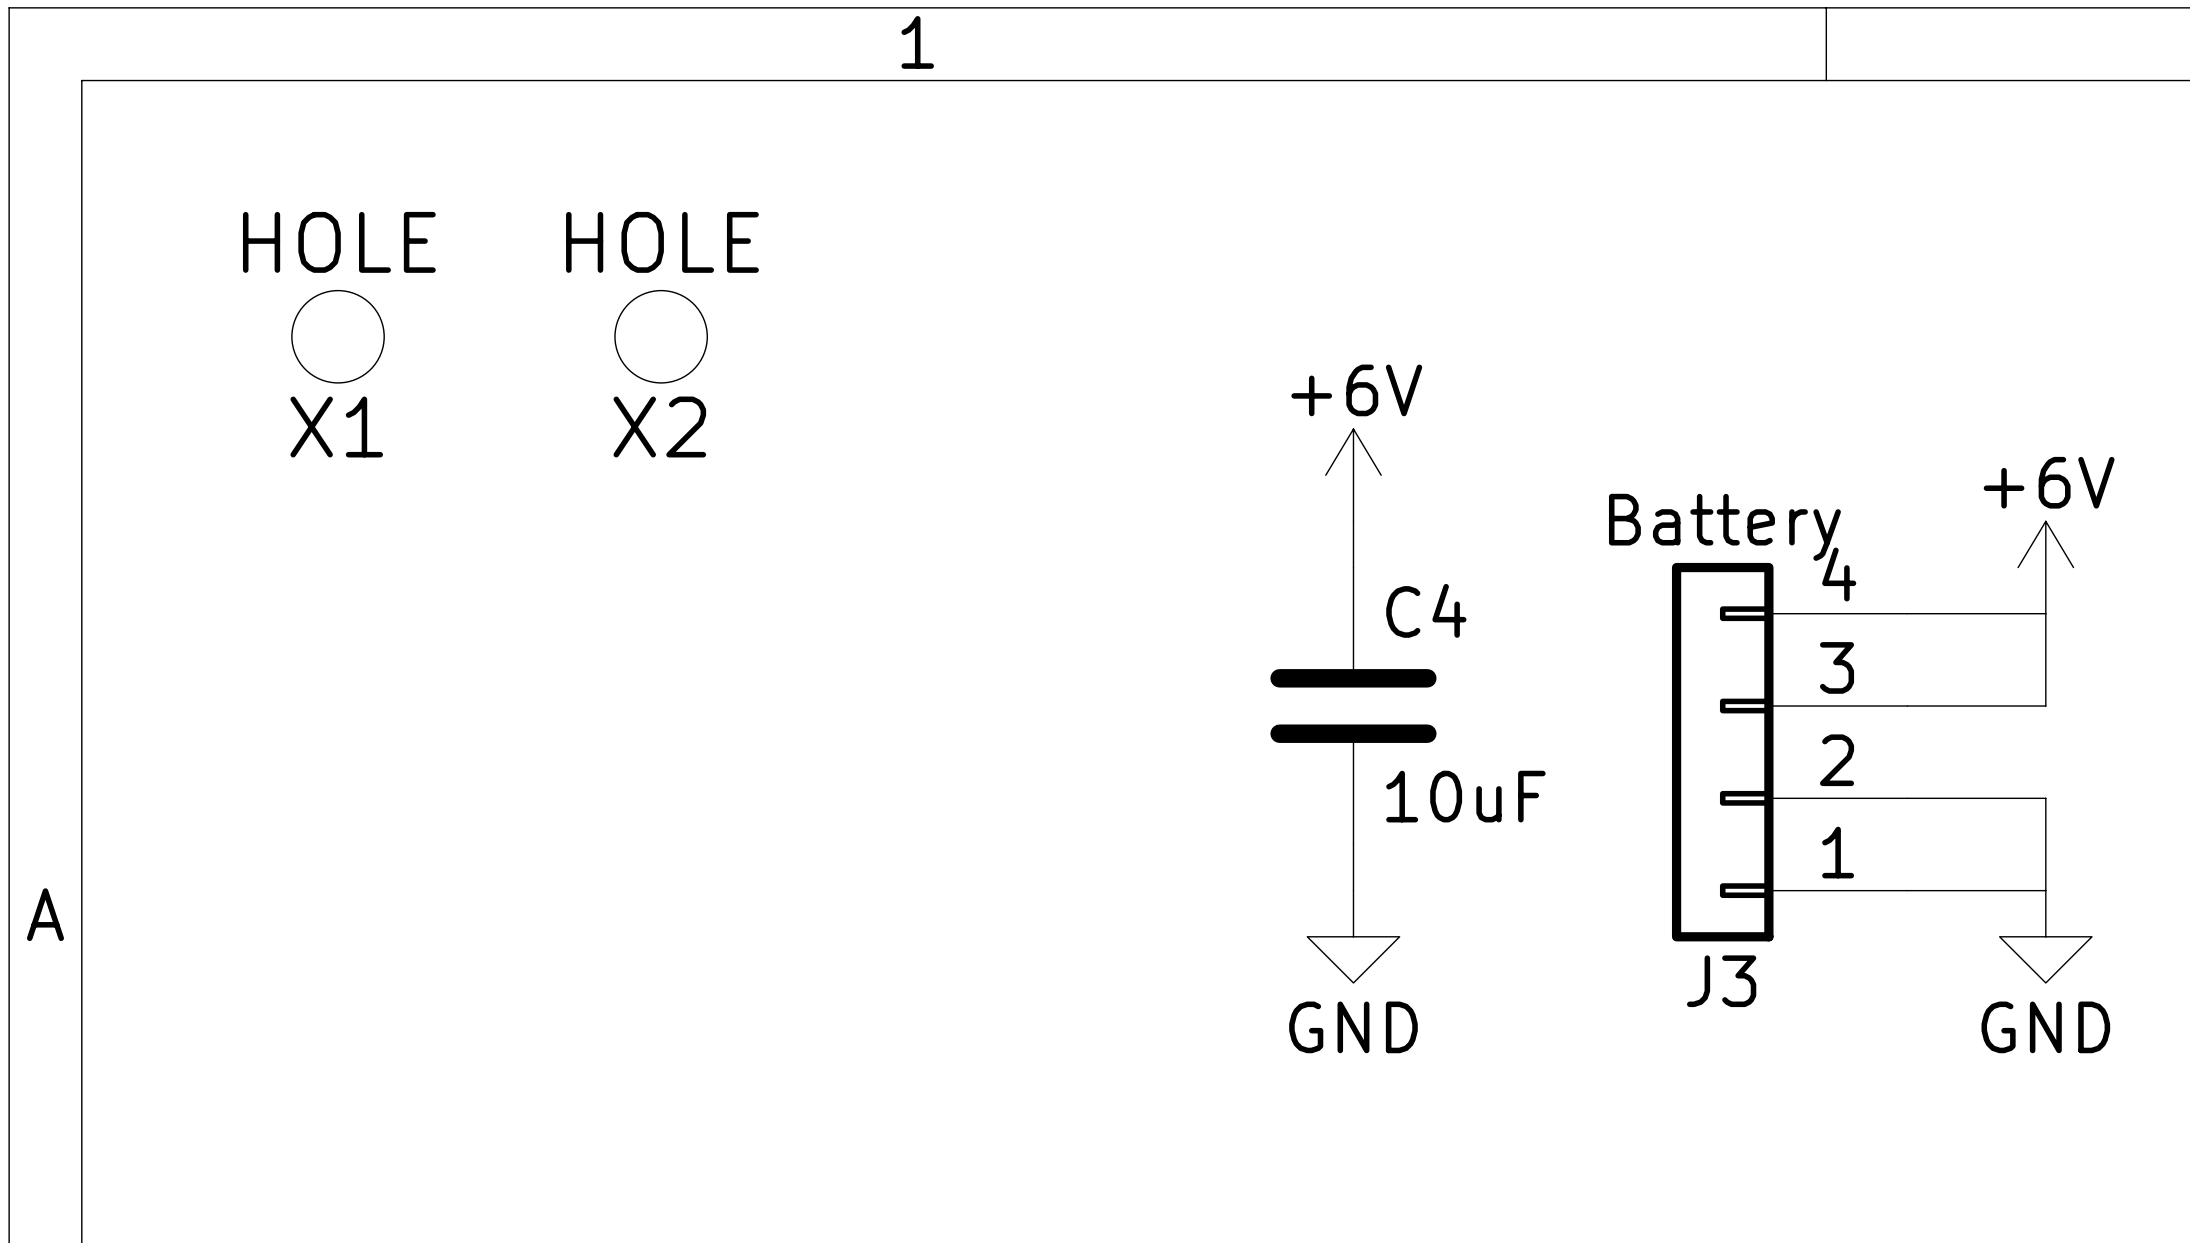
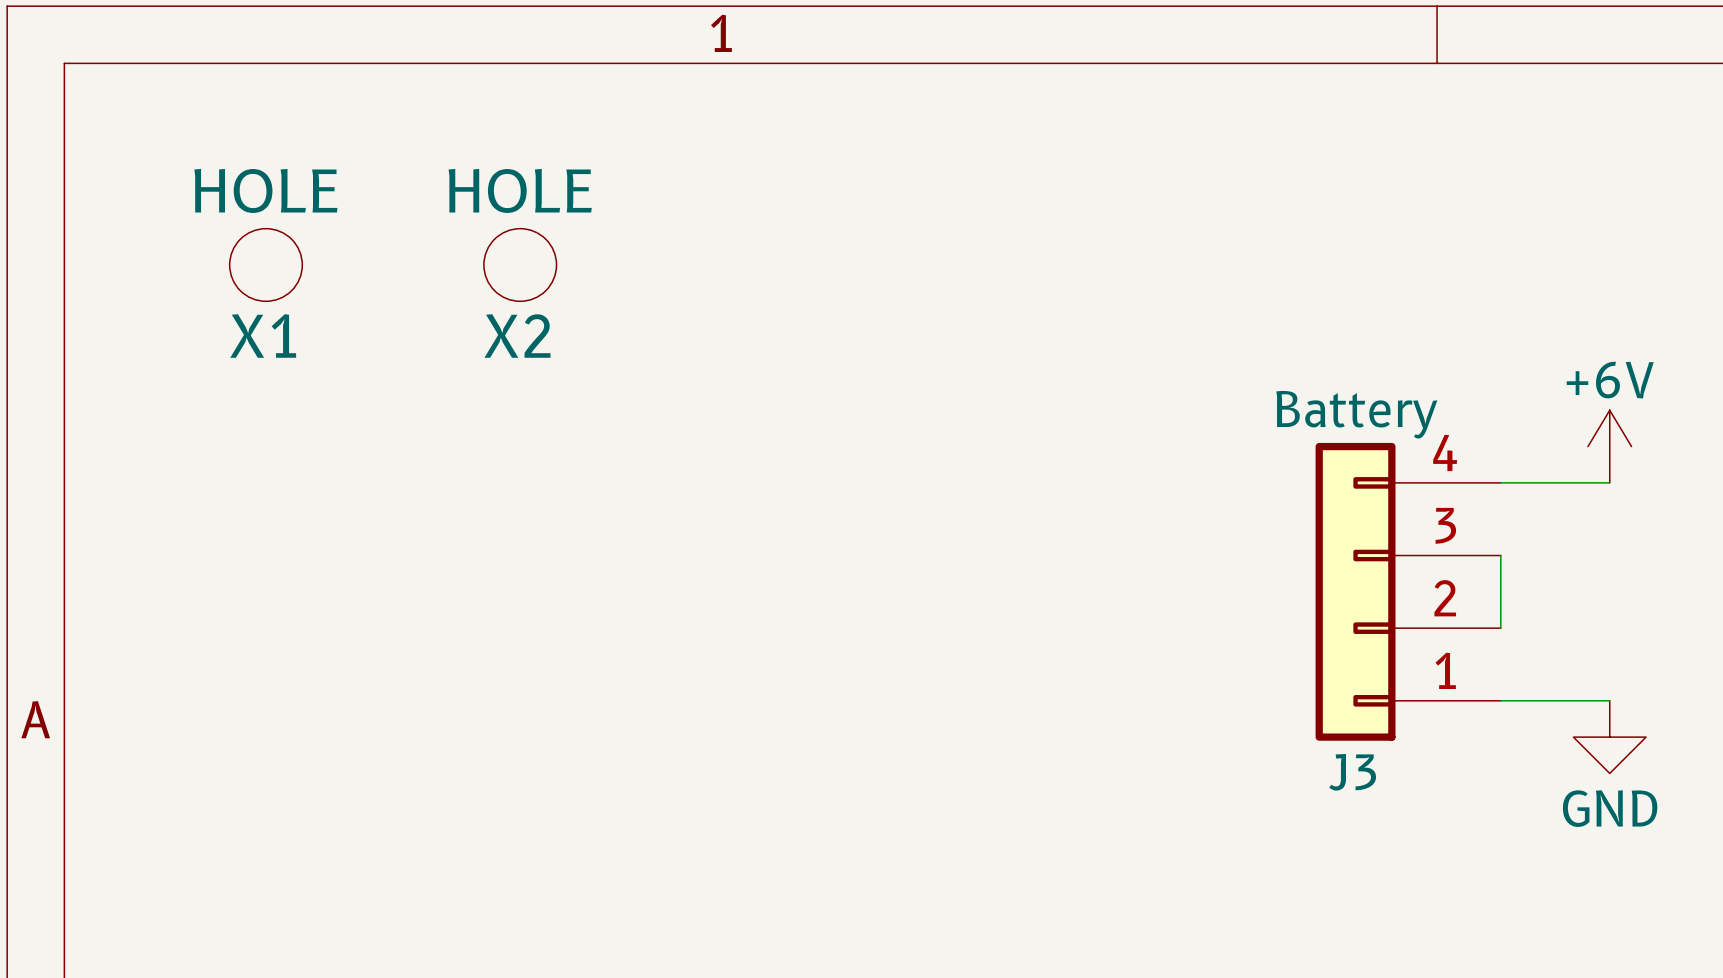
power symbol: +6V (1353, 475) -> none
wire: (1353, 521) (1353, 567) -> none
wire: (2045, 613) (2045, 706) (1907, 706) -> (1500, 628) (1500, 555)
C4: 10uF (1353, 706) -> none
wire: (1907, 798) (2045, 798) (2045, 890) -> none
wire: (1353, 844) (1353, 890) -> none
power symbol: GND (1353, 936) -> none

